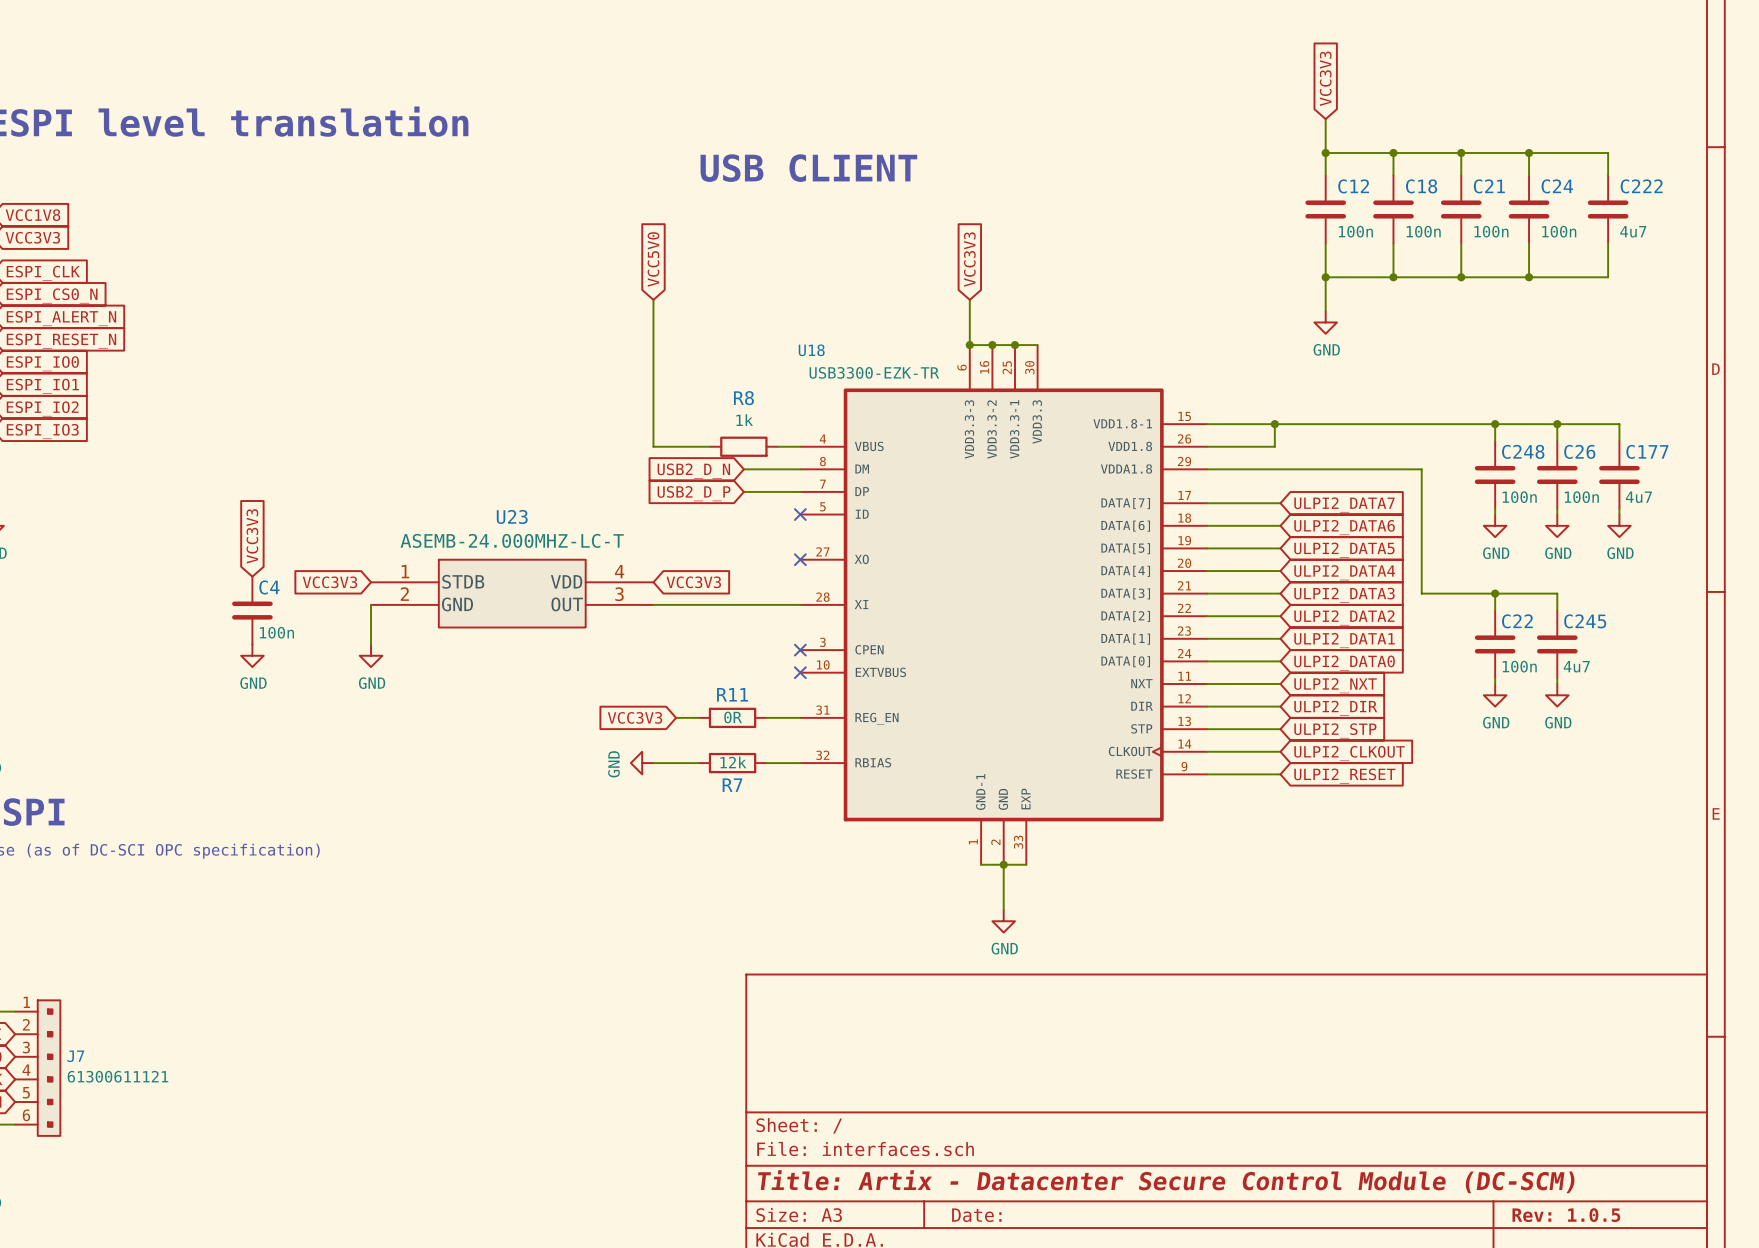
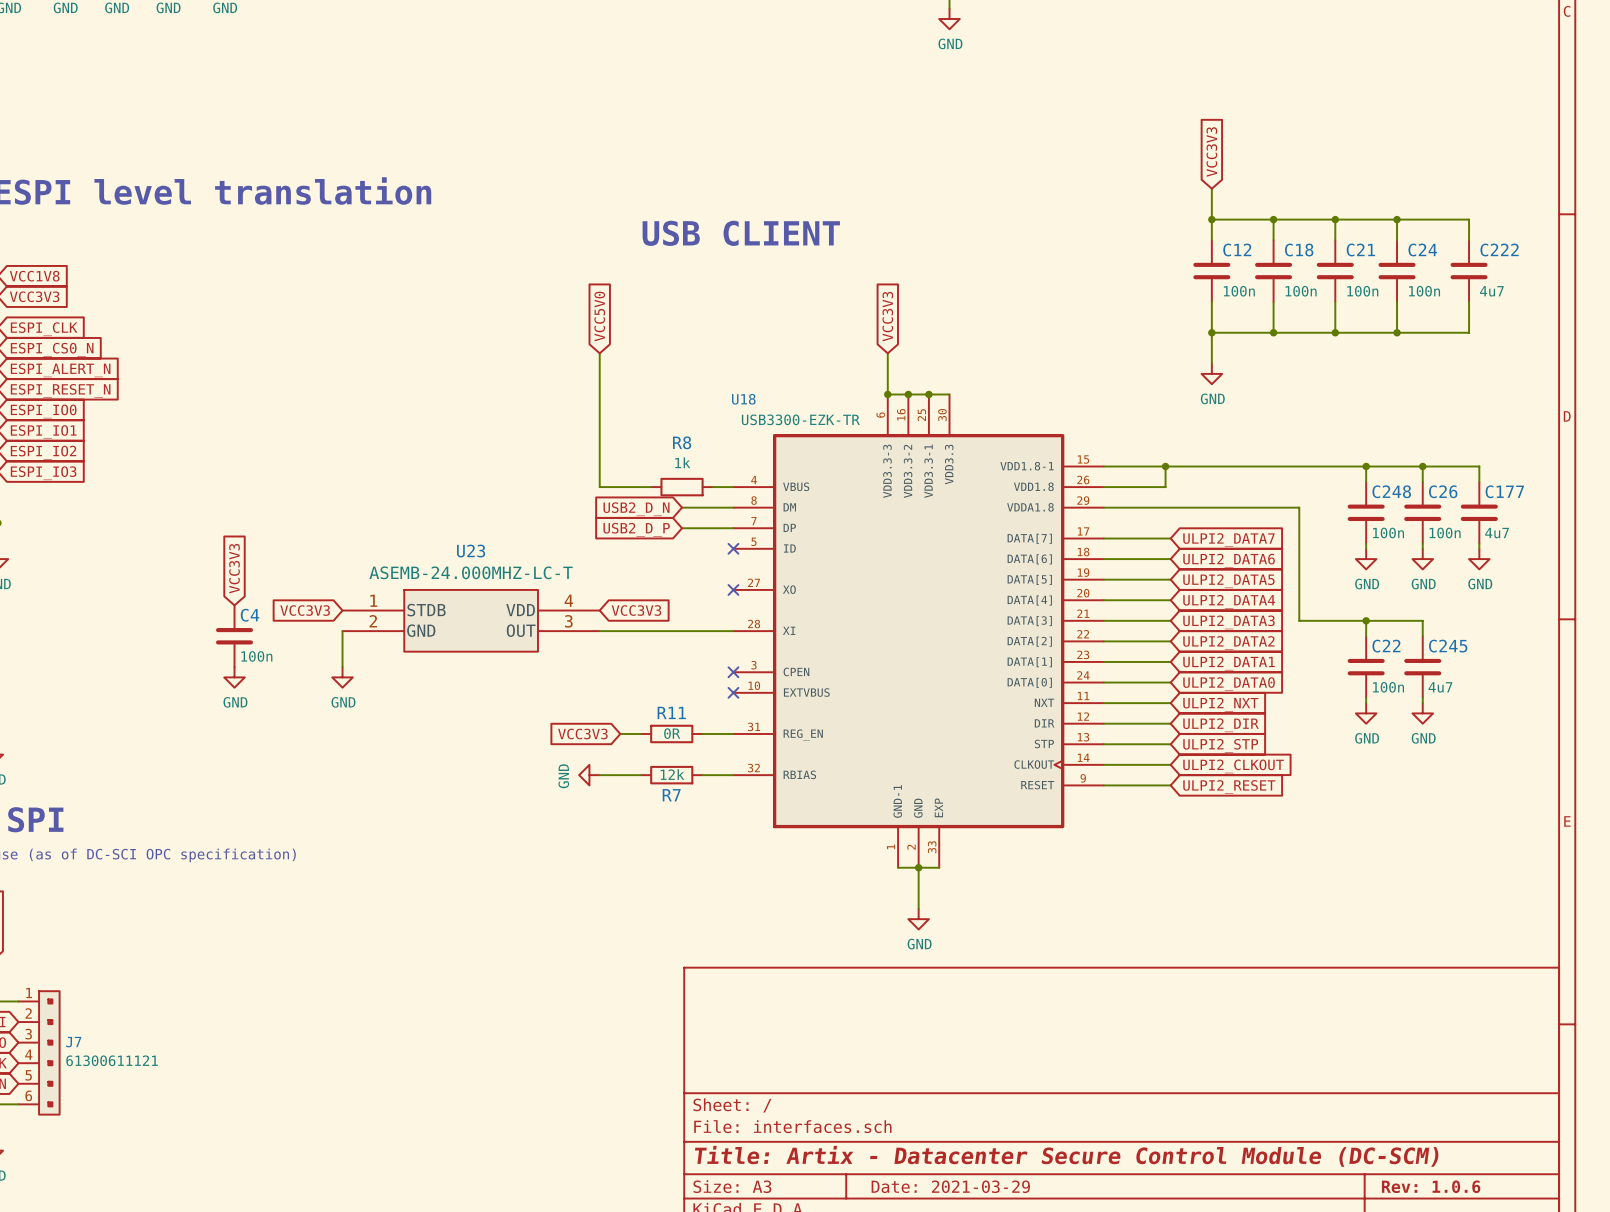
title block: Date: (976, 1215) -> Date: 2021-03-29 (950, 1186)
title block: Rev: 1.0.5 (1566, 1215) -> Rev: 1.0.6 (1431, 1186)

